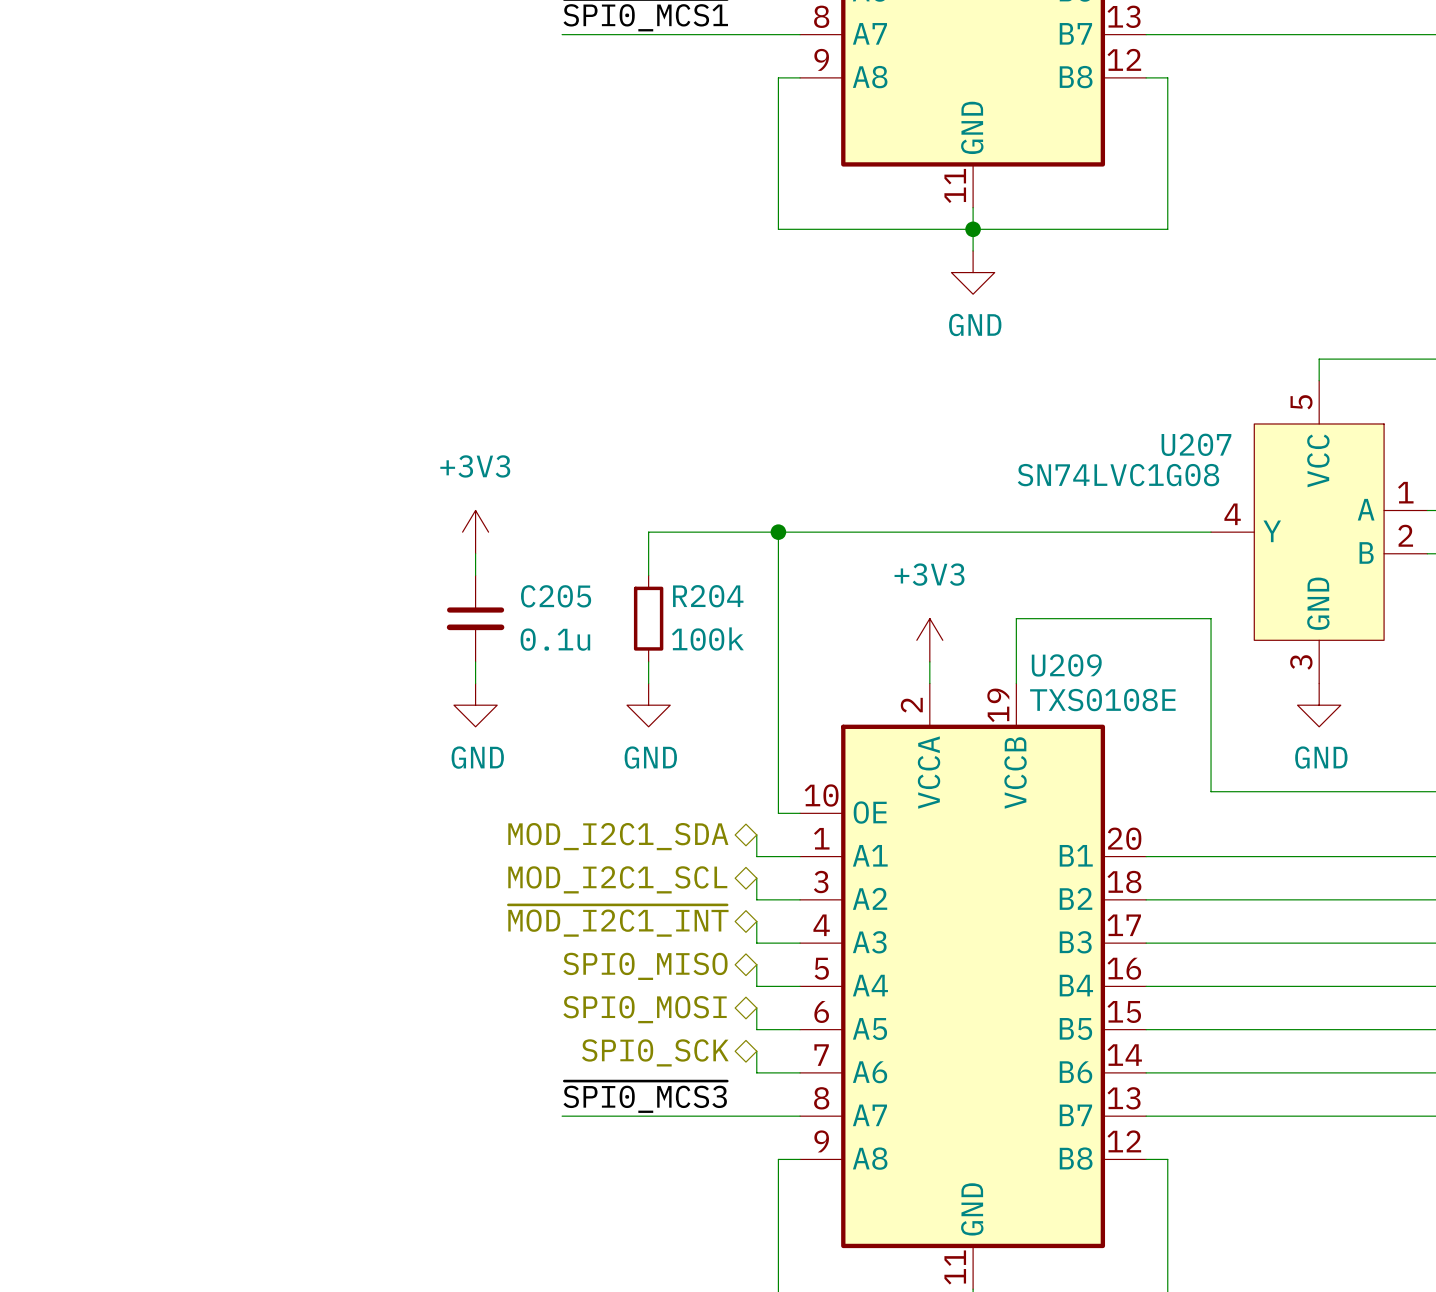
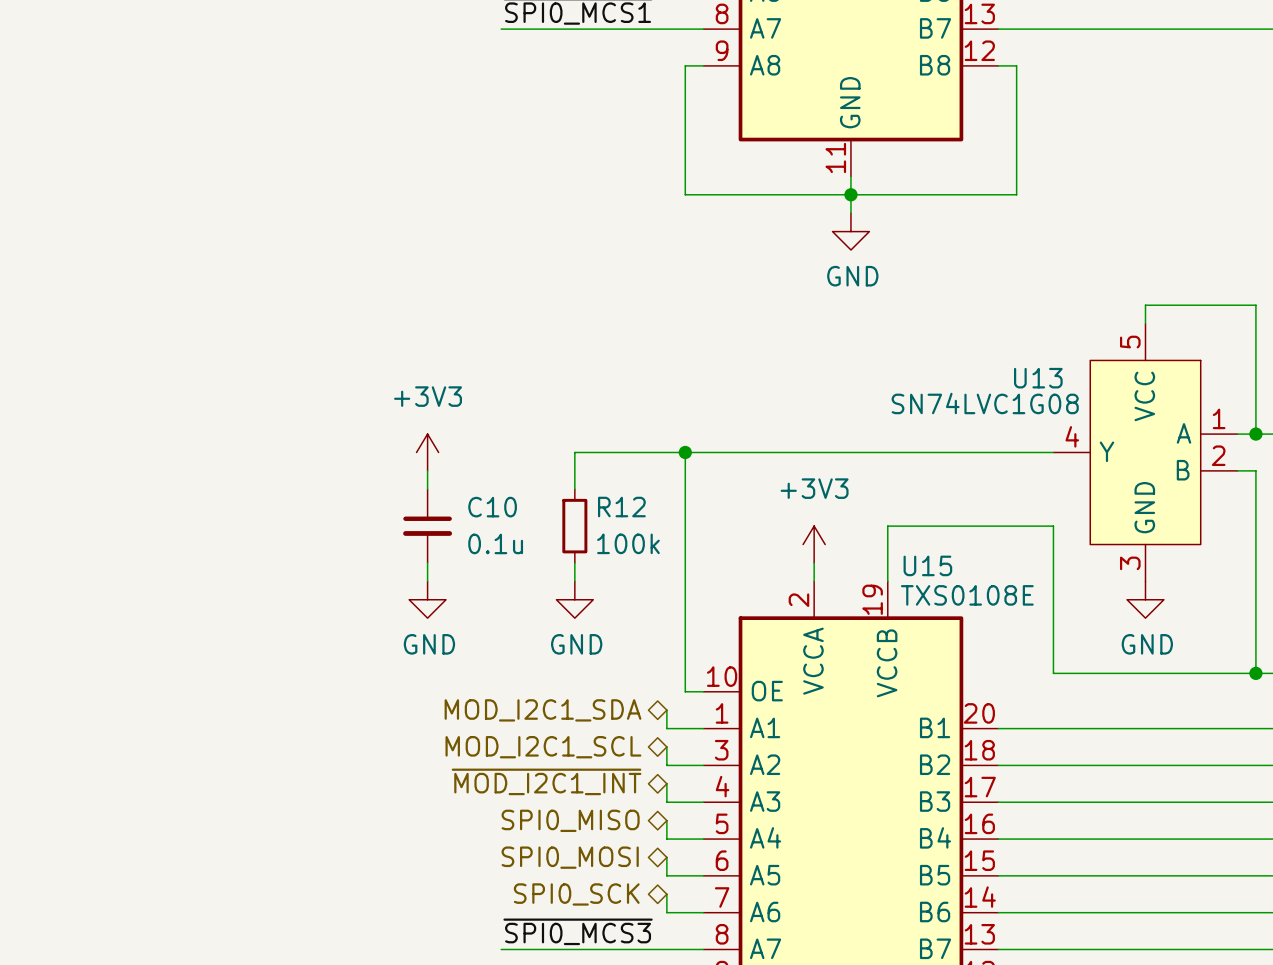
U207 name: U207 (1196, 444) -> U13 (1038, 378)
C205 name: C205 (556, 596) -> C10 (492, 507)
R204 name: R204 (708, 596) -> R12 (621, 507)
U209 name: U209 (1066, 665) -> U15 (927, 565)

